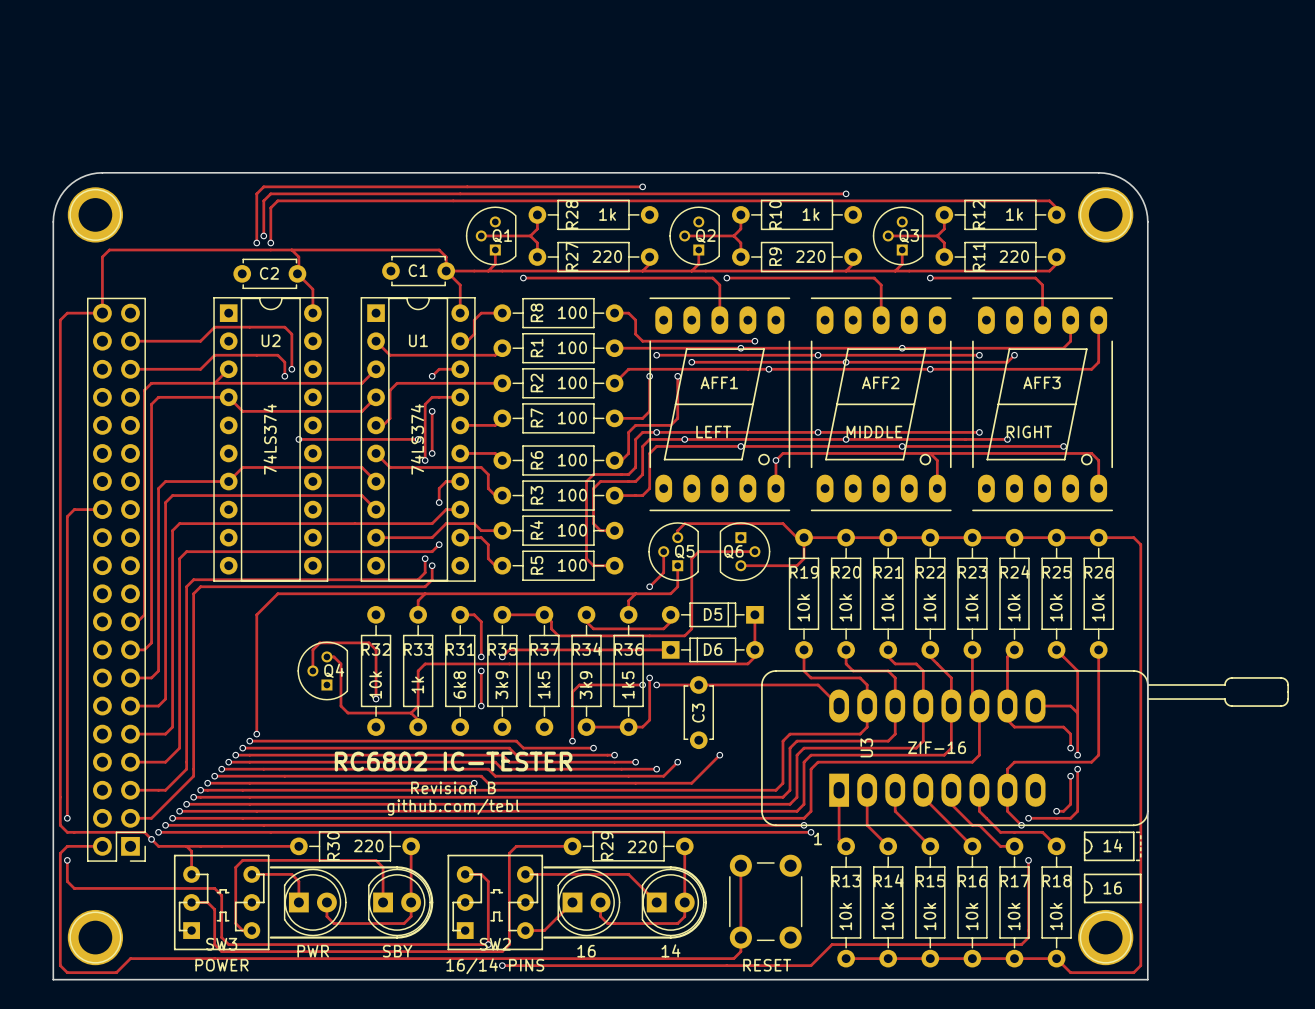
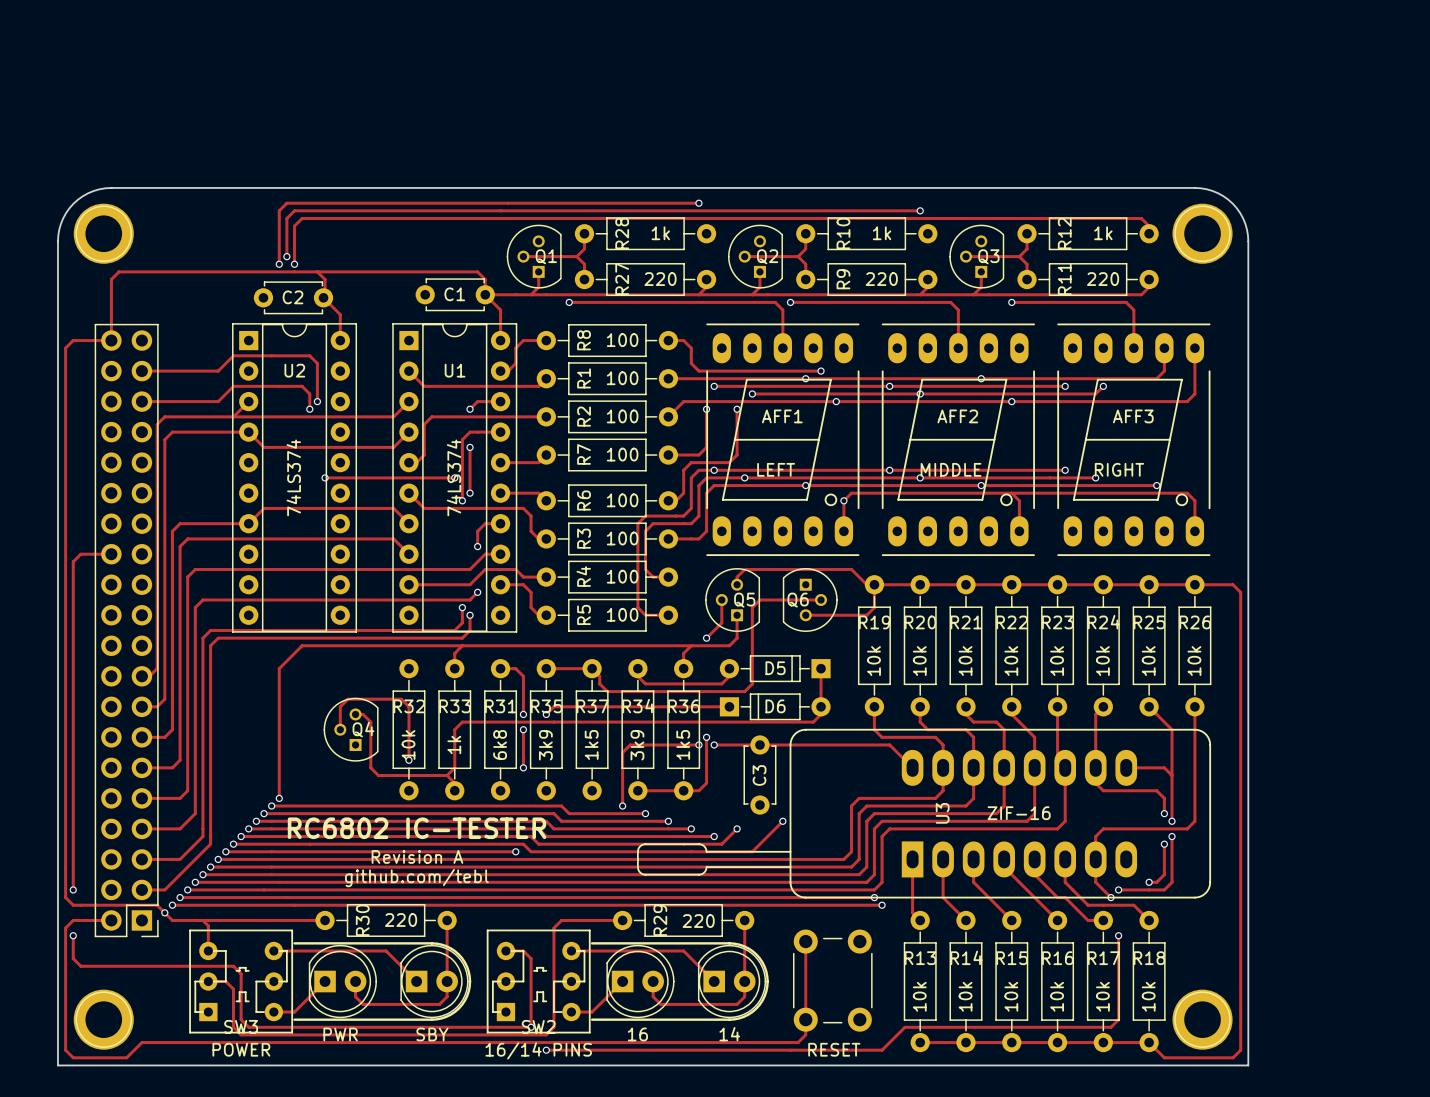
U3 footprint: [761, 670, 1289, 904] -> [636, 728, 1212, 899]
text position: RC6802 IC-TESTER (453, 761) -> RC6802 IC-TESTER (417, 828)
text: Revision B (453, 787) -> Revision A (417, 856)
text position: github.com/tebl (453, 807) -> github.com/tebl (416, 878)
text: 1 (818, 838) -> none
track: (291, 874) (298, 881) (298, 902) -> (273, 1012) (294, 1012) (325, 981)
track: (383, 902) (383, 867) (376, 860) (242, 860) (235, 867) (235, 923) (242, 930) (251, 930) -> (416, 981) (386, 950) (317, 950)

